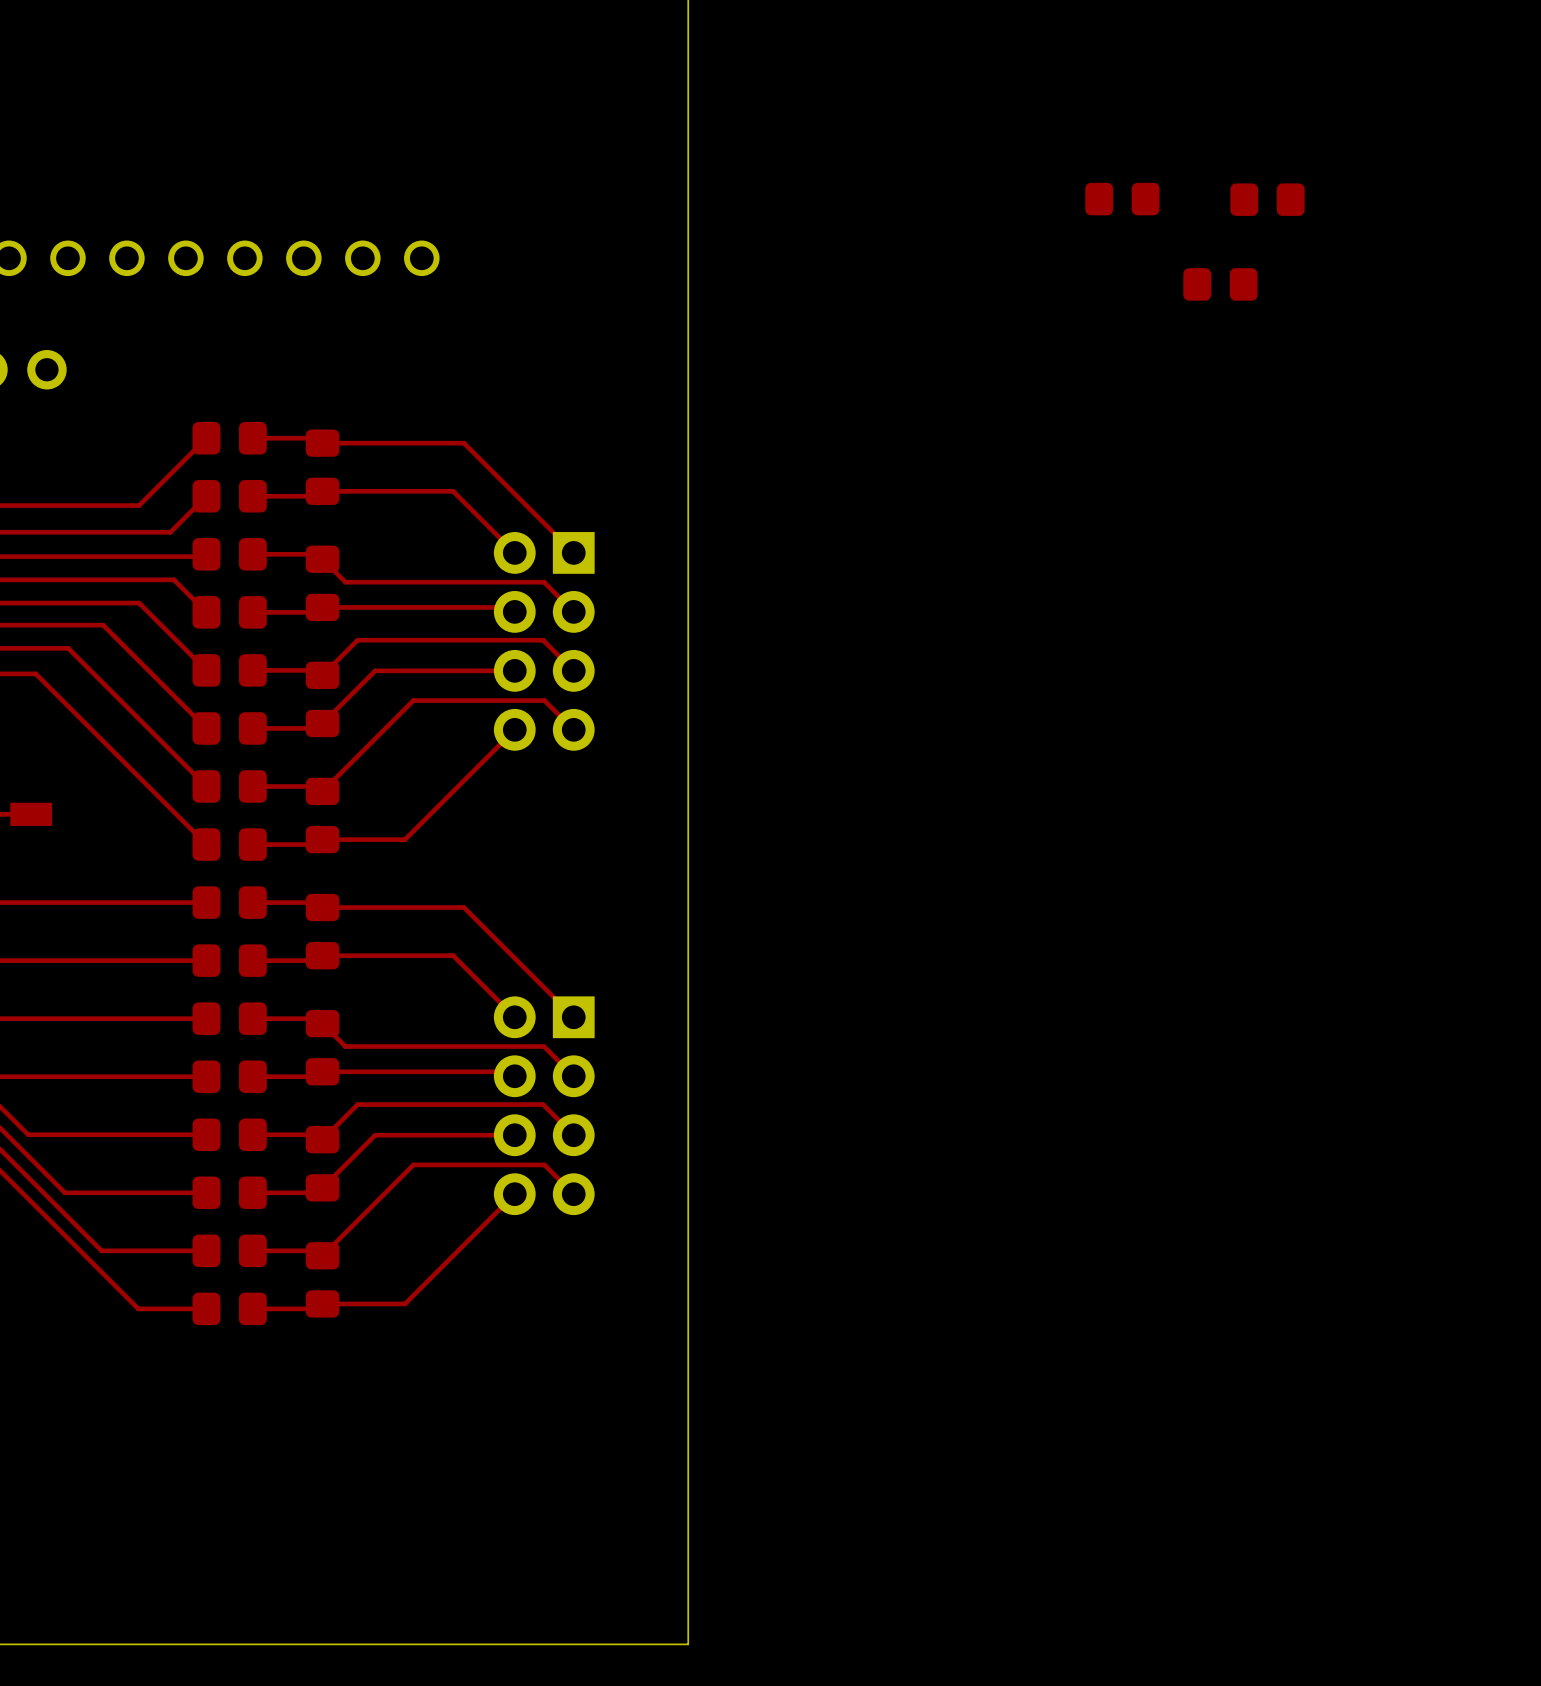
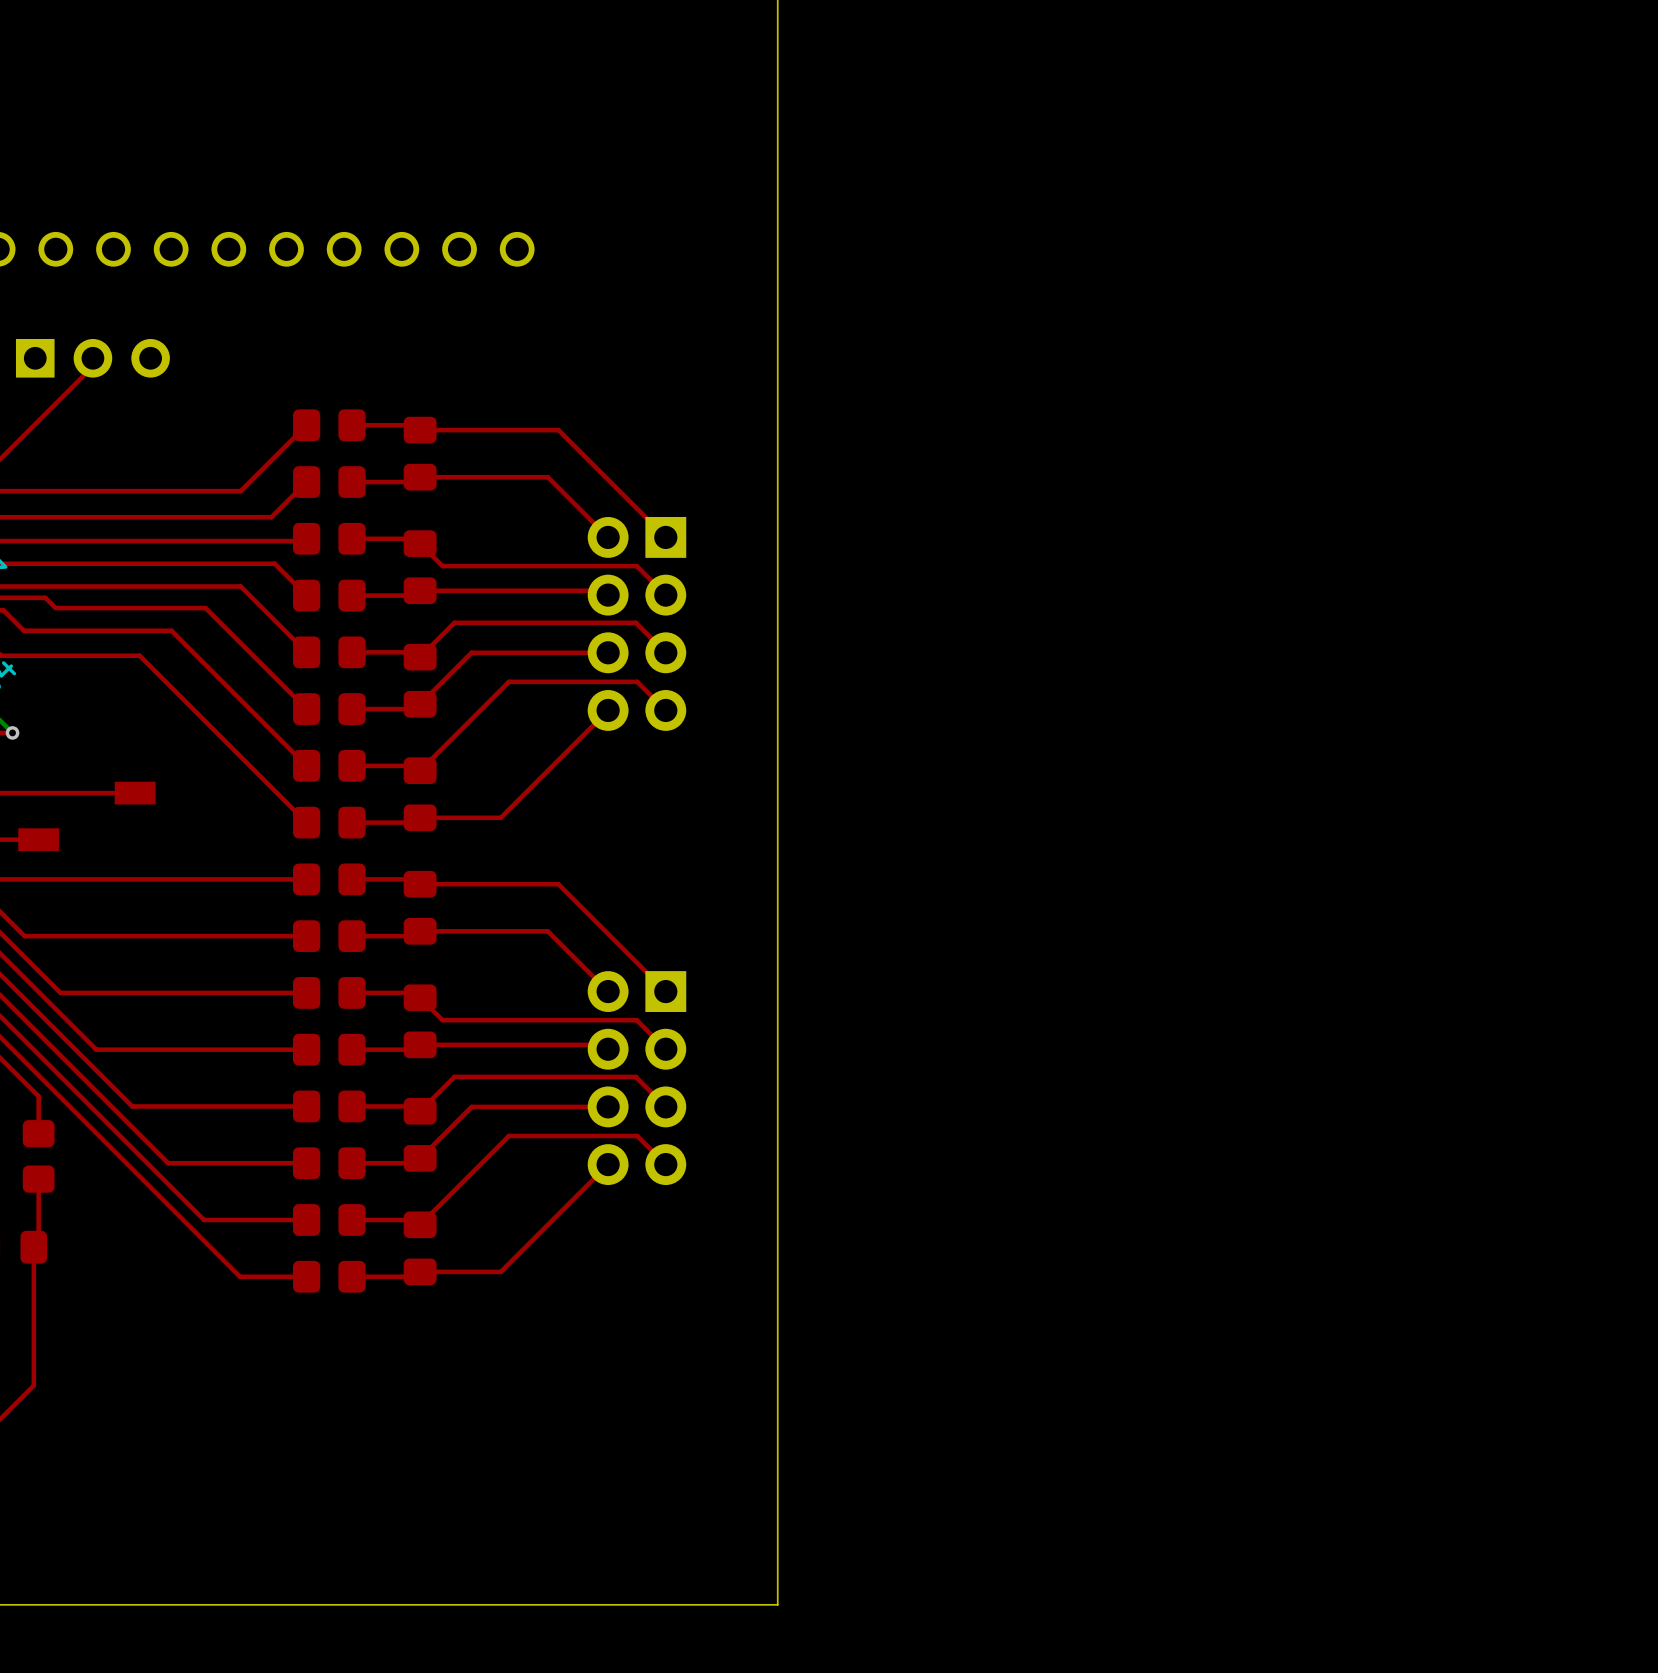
part: (1122, 199) -> none
part: (1267, 199) -> none
part: (1220, 284) -> none

